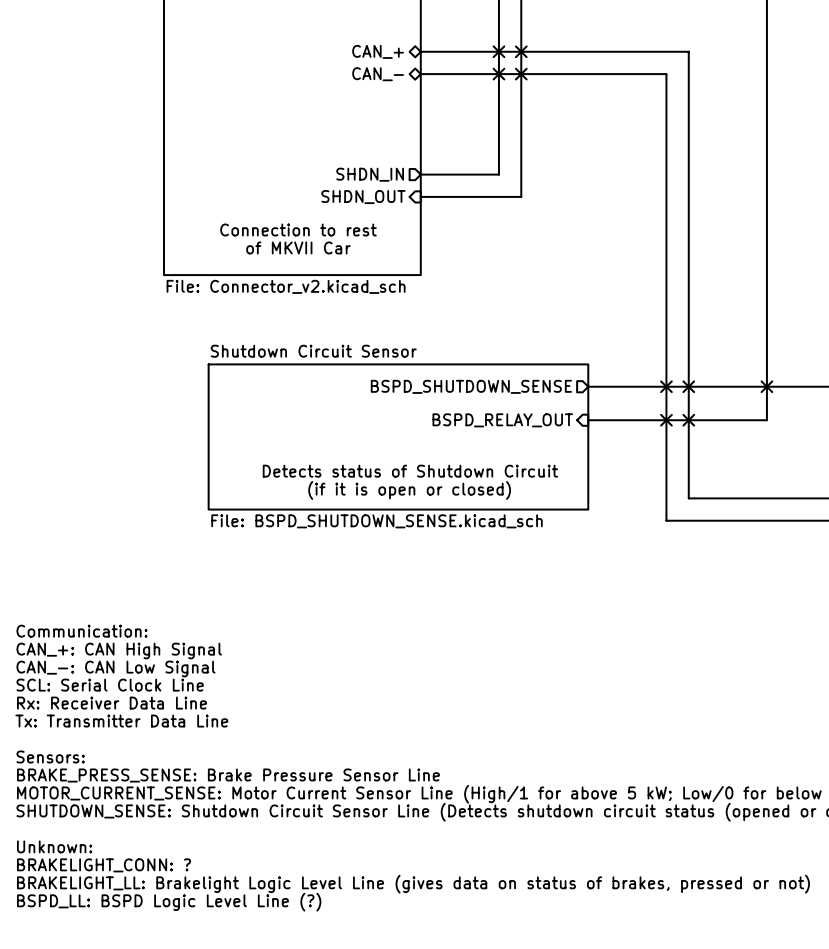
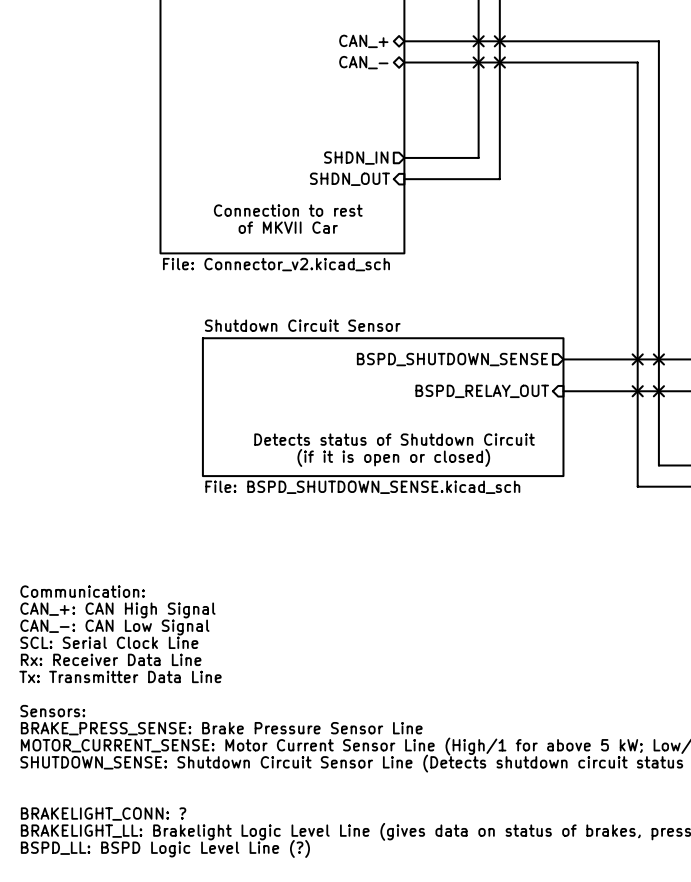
text: Unknown: (54, 846) -> none

